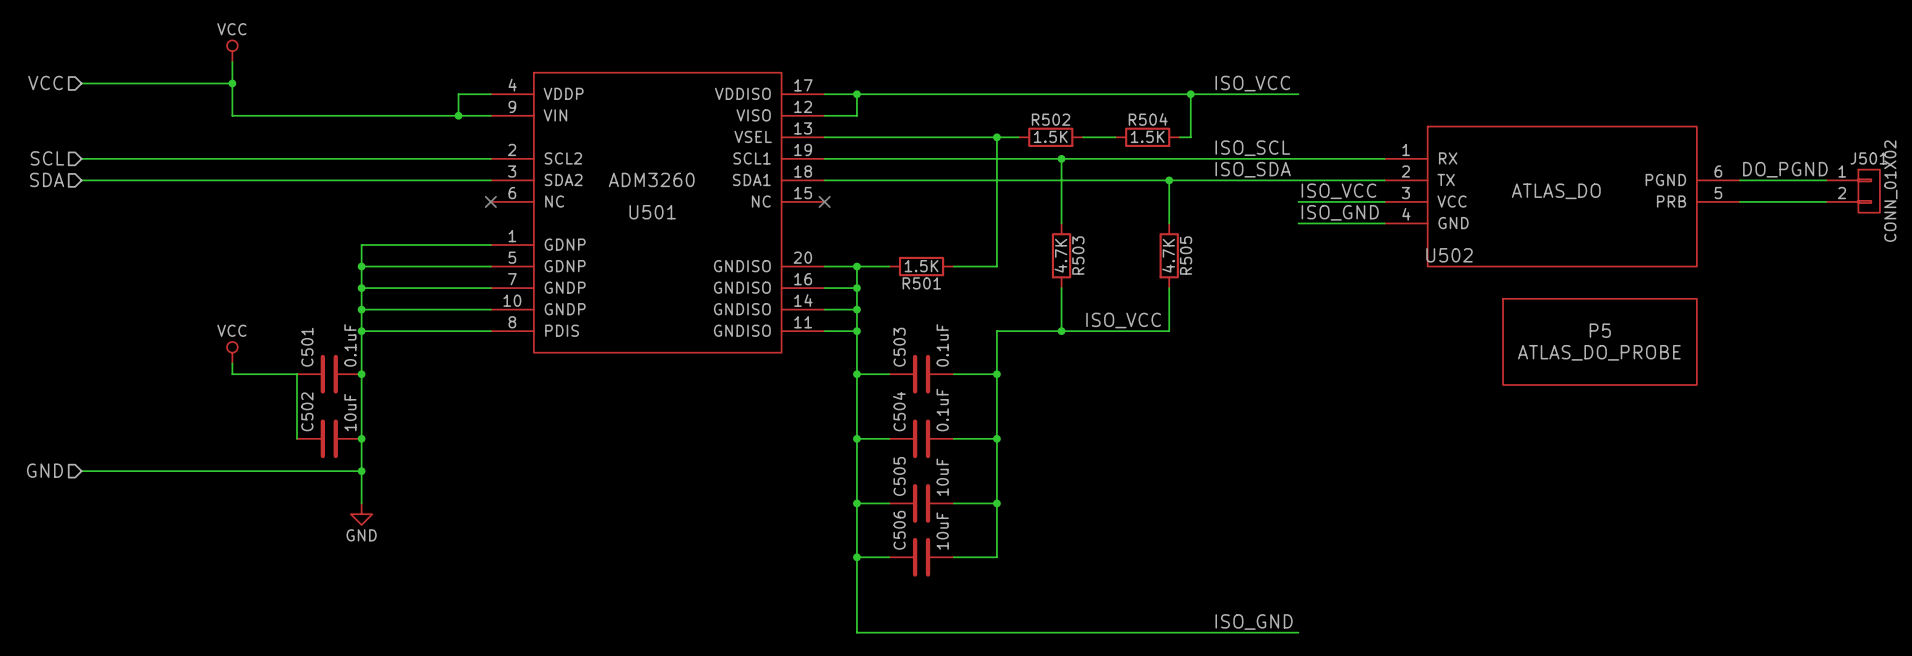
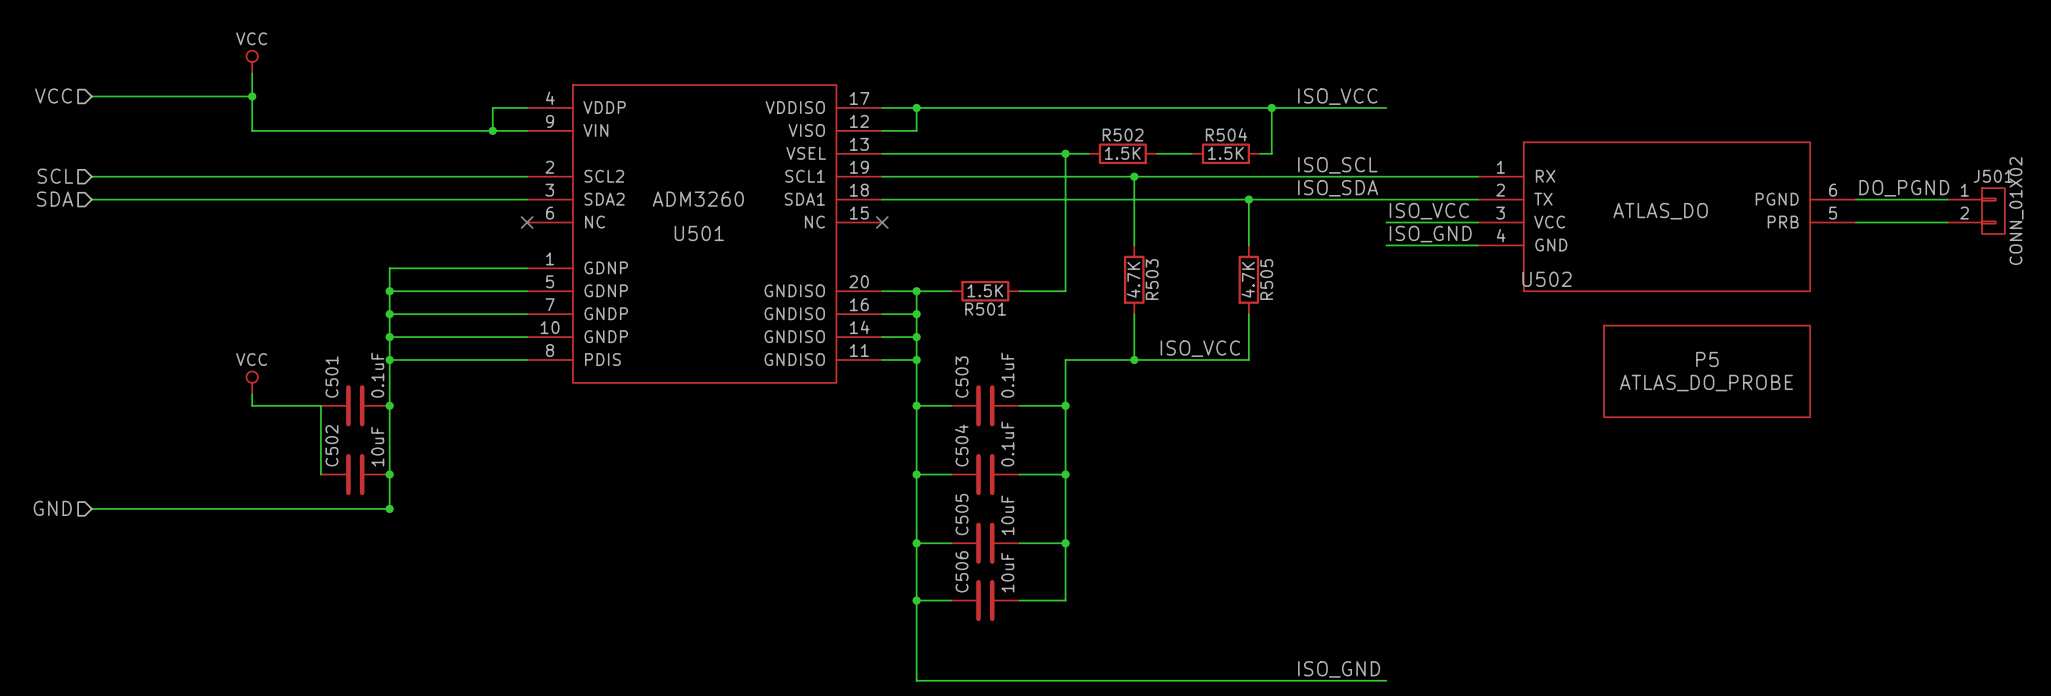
wire: (361, 471) (361, 503) -> none
power symbol: GND (361, 514) -> none

